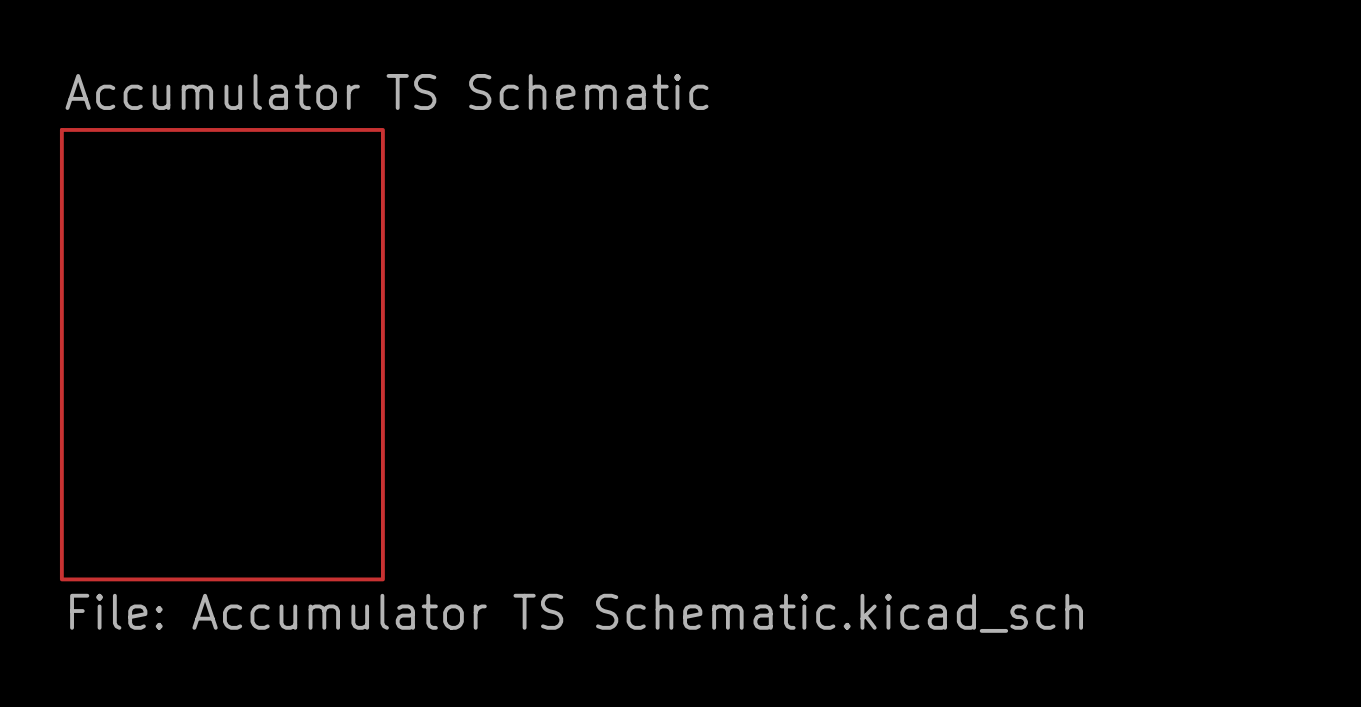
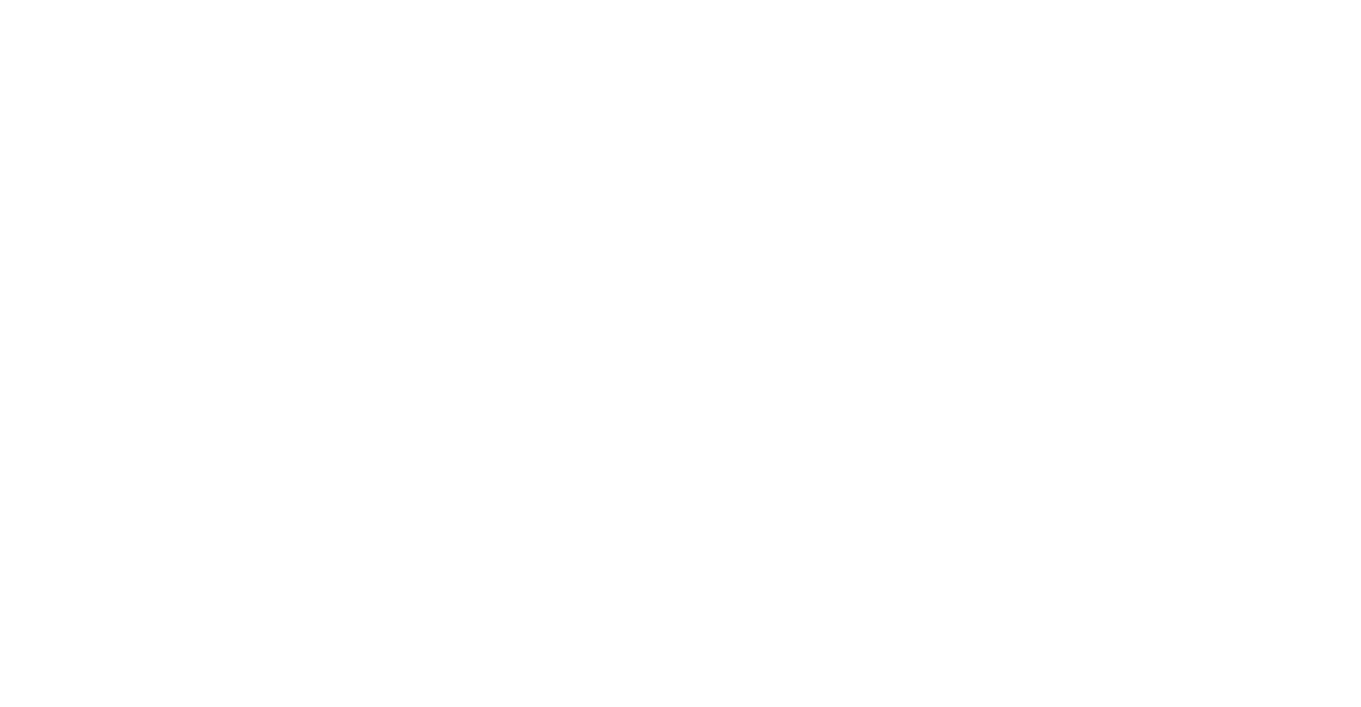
sheet Accumulator TS Schematic: File: Accumulator TS Schematic.kicad_sch (222, 354) -> none

